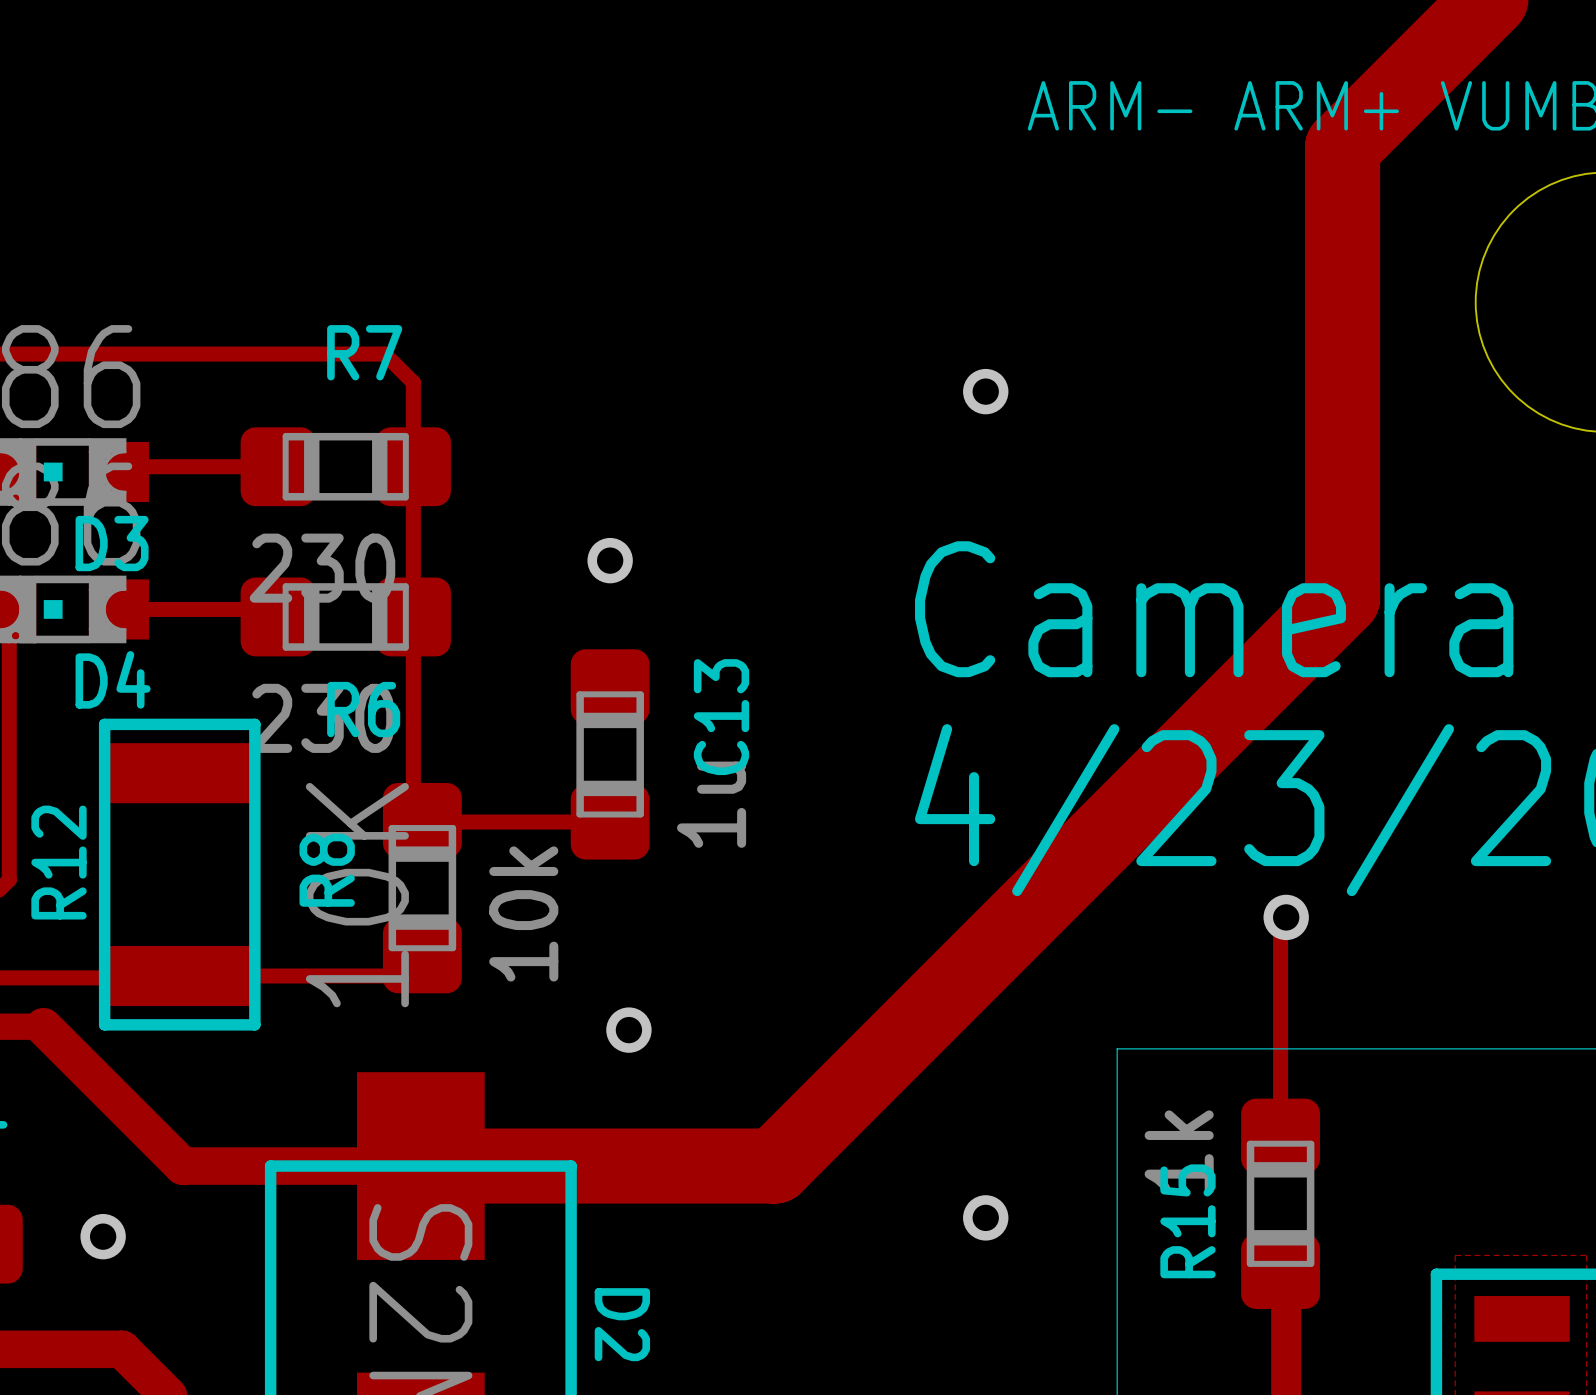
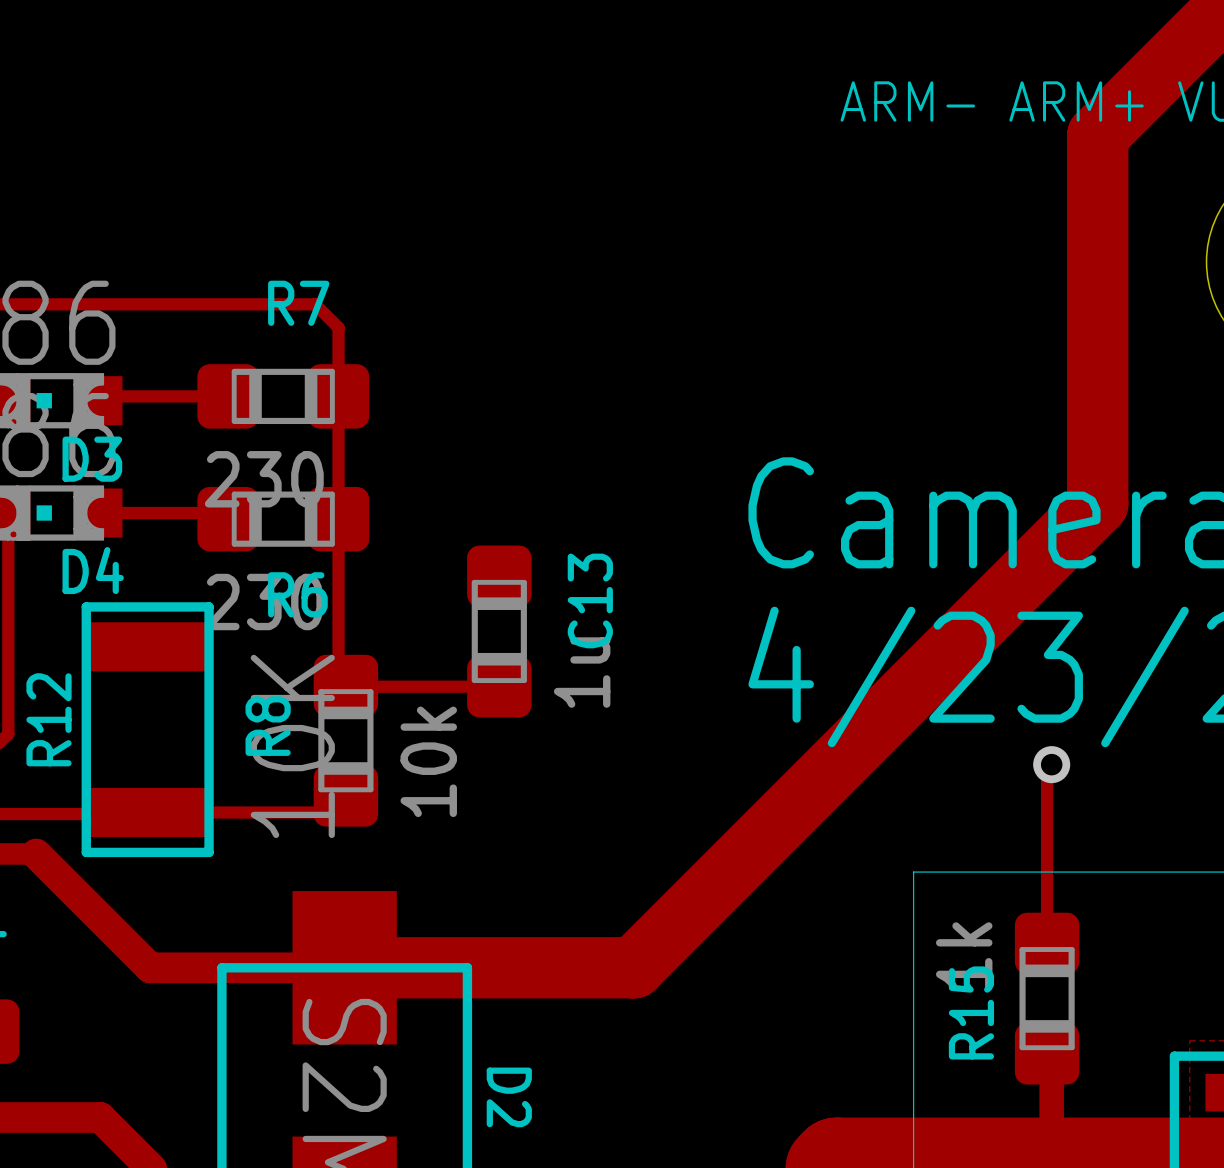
via: (985, 391) -> none
via: (610, 560) -> none
via: (628, 1030) -> none
via: (985, 1217) -> none
via: (103, 1236) -> none

